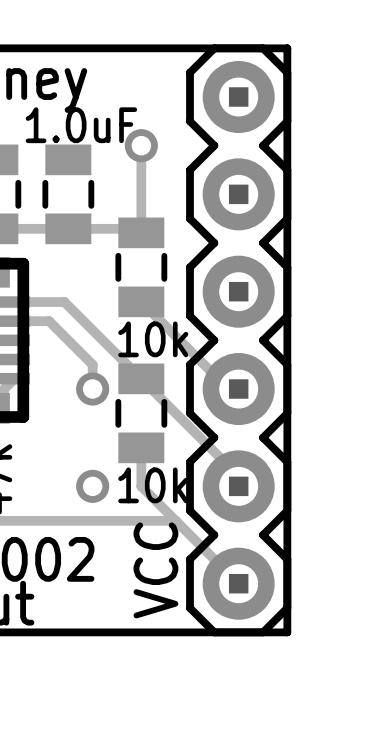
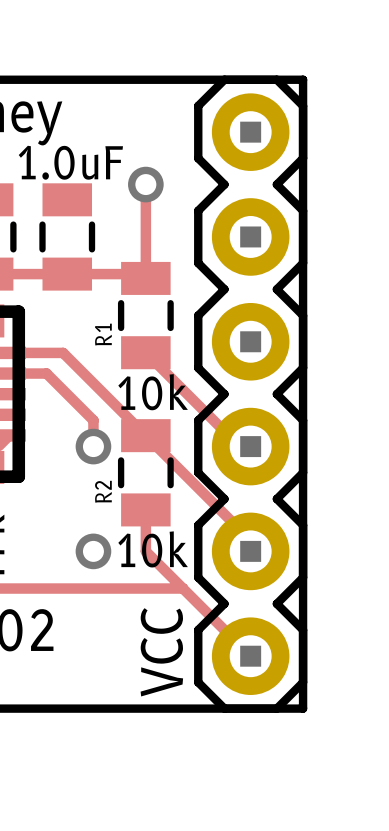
R1 name: none -> R1 (103, 334)
R2 name: none -> R2 (103, 491)

